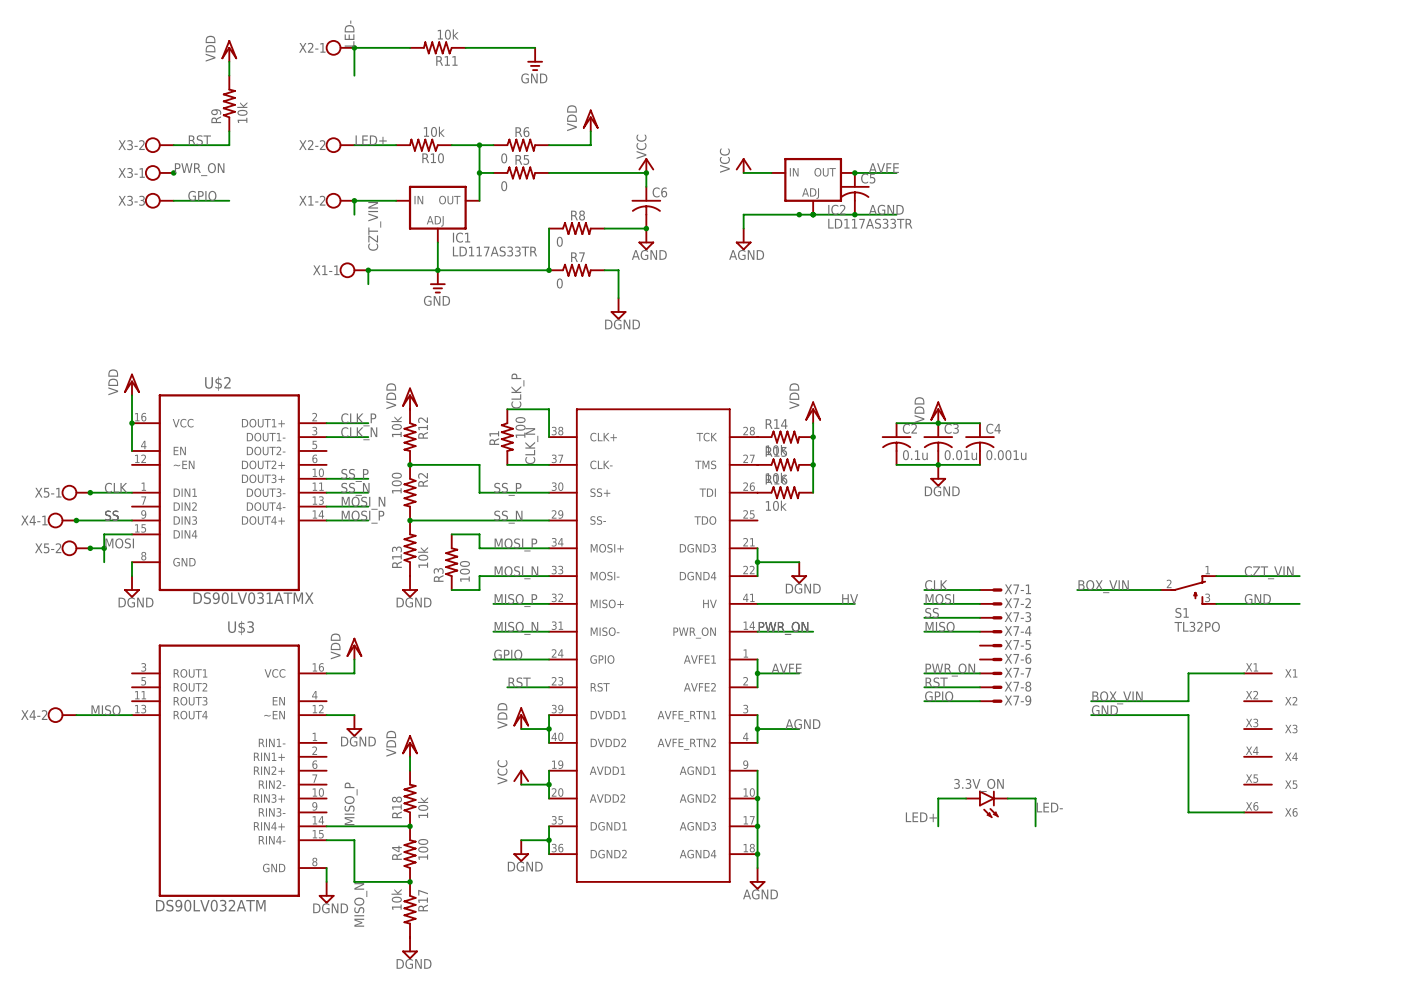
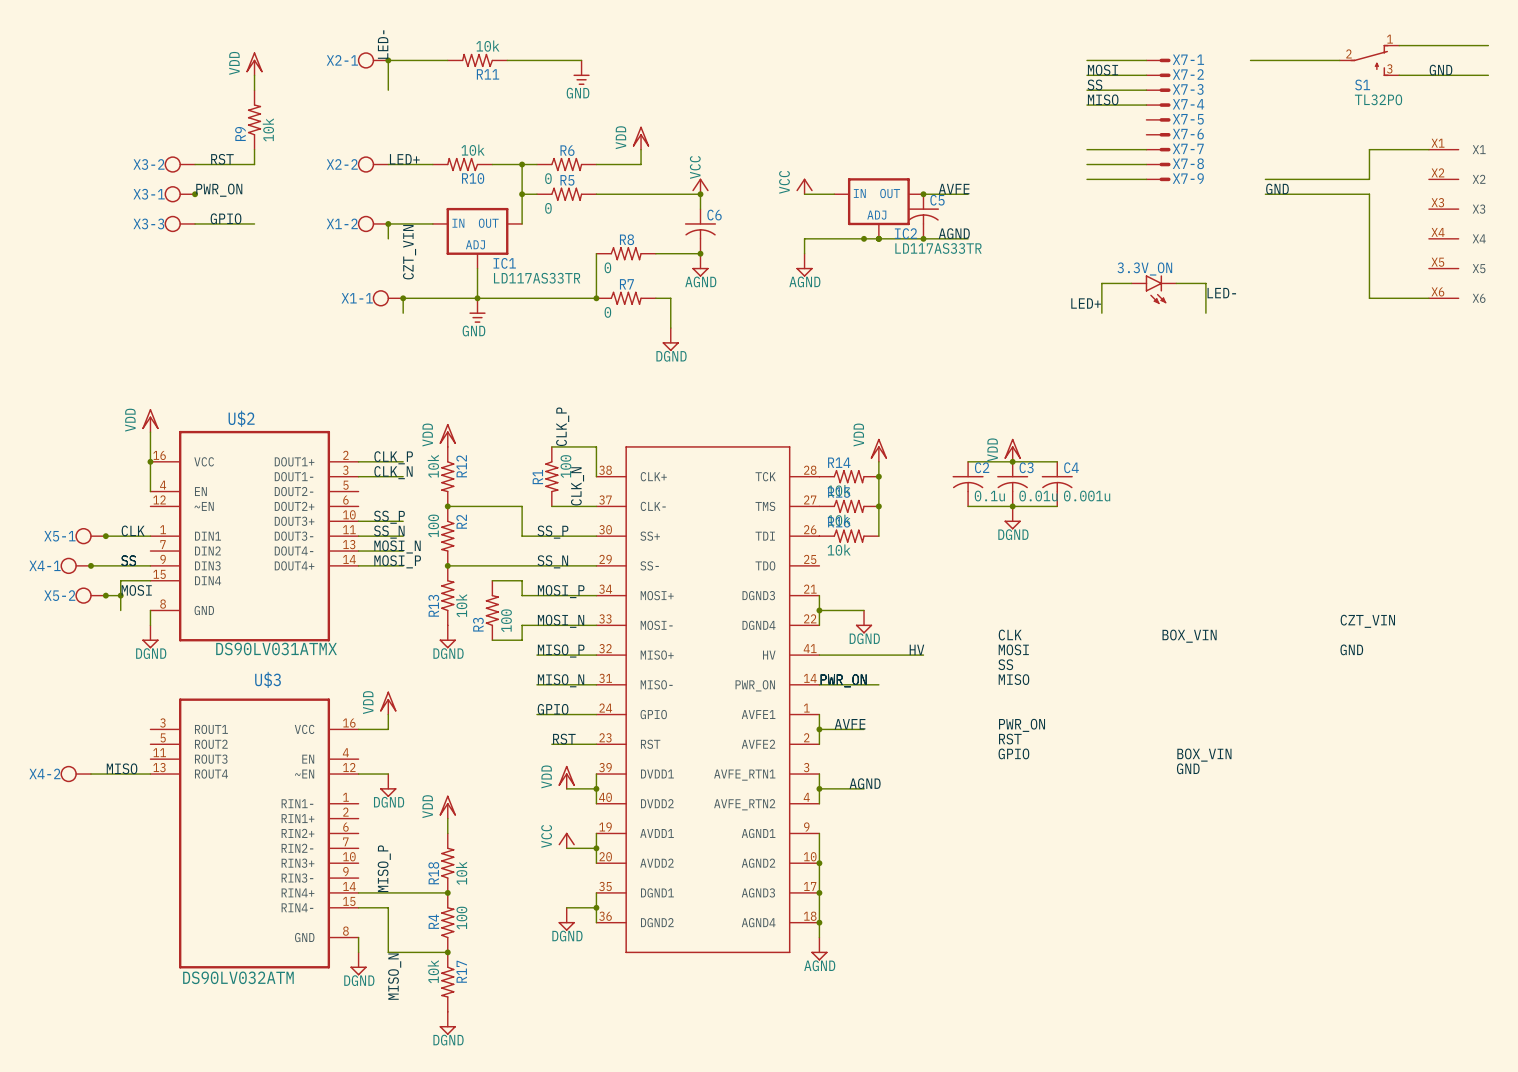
wire: none -> (1399, 45) (1488, 45)
wire: none -> (1087, 60) (1146, 60)
wire: none -> (1250, 60) (1339, 60)
label: none -> MOSI (1102, 70)
label: none -> GND (1440, 70)
wire: none -> (1087, 75) (1146, 75)
wire: none -> (1399, 75) (1488, 75)
label: none -> SS (1094, 84)
wire: none -> (1087, 90) (1146, 90)
label: none -> MISO (1103, 99)
wire: none -> (1087, 105) (1146, 105)
wire: none -> (1087, 149) (1146, 149)
wire: none -> (1428, 149) (1369, 149) (1369, 179) (1265, 179)
wire: none -> (1087, 164) (1146, 164)
wire: none -> (1087, 179) (1146, 179)
label: none -> GND (1277, 189)
wire: none -> (1265, 194) (1369, 194) (1369, 298) (1428, 298)
part: none -> (1443, 223)
wire: none -> (1131, 283) (1101, 283) (1101, 313)
wire: none -> (1176, 283) (1205, 283) (1205, 313)
label: none -> LED- (1221, 293)
label: none -> LED+ (1086, 303)
wire: (1216, 576) (1299, 576) -> none
wire: (924, 590) (979, 590) -> none
X7-1 position: (991, 590) -> (1158, 60)
wire: (1077, 590) (1160, 590) -> none
S1 position: (1188, 590) -> (1369, 60)
wire: (924, 603) (979, 603) -> none
X7-2 position: (991, 603) -> (1158, 75)
wire: (1216, 603) (1299, 603) -> none
wire: (924, 617) (979, 617) -> none
X7-3 position: (991, 617) -> (1158, 90)
wire: (924, 631) (979, 631) -> none
X7-4 position: (991, 631) -> (1158, 105)
X7-5 position: (991, 645) -> (1158, 119)
X7-6 position: (991, 659) -> (1158, 134)
wire: (924, 673) (979, 673) -> none
X7-7 position: (991, 673) -> (1158, 149)
wire: (1244, 673) (1188, 673) (1188, 701) (1091, 701) -> none
wire: (924, 687) (979, 687) -> none
X7-8 position: (991, 687) -> (1158, 164)
wire: (924, 701) (979, 701) -> none
X7-9 position: (991, 701) -> (1158, 179)
wire: (1091, 715) (1188, 715) (1188, 812) (1244, 812) -> none
part: (1257, 742) -> none
wire: (966, 798) (938, 798) (938, 826) -> none
wire: (1007, 798) (1035, 798) (1035, 826) -> none
3.3V_ON position: (986, 804) -> (1153, 289)
label: LED- (1049, 807) -> none
label: LED+ (921, 817) -> none

